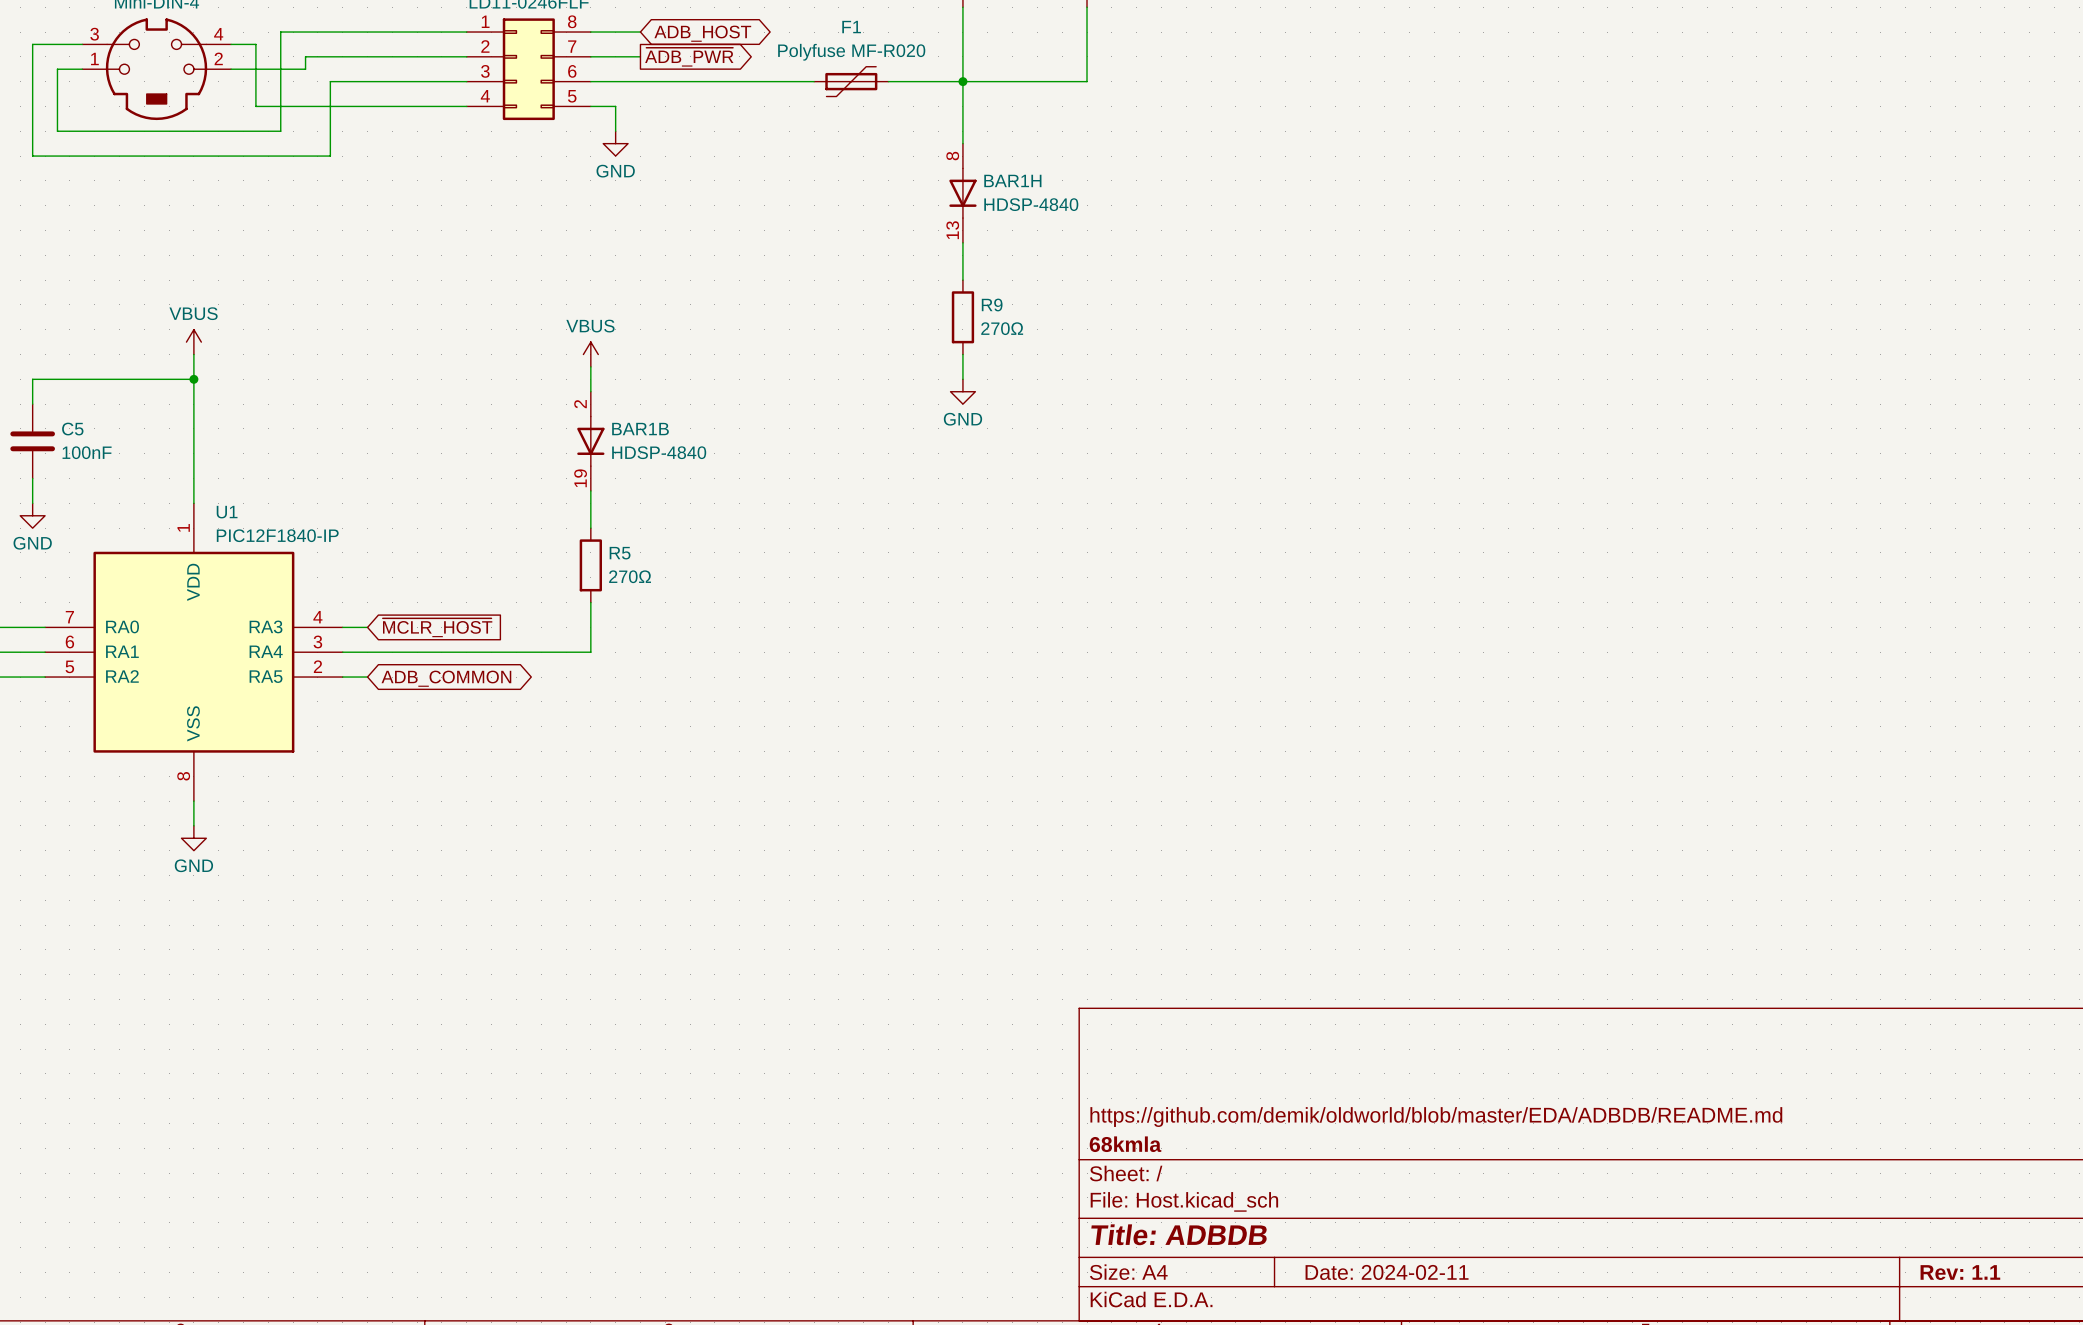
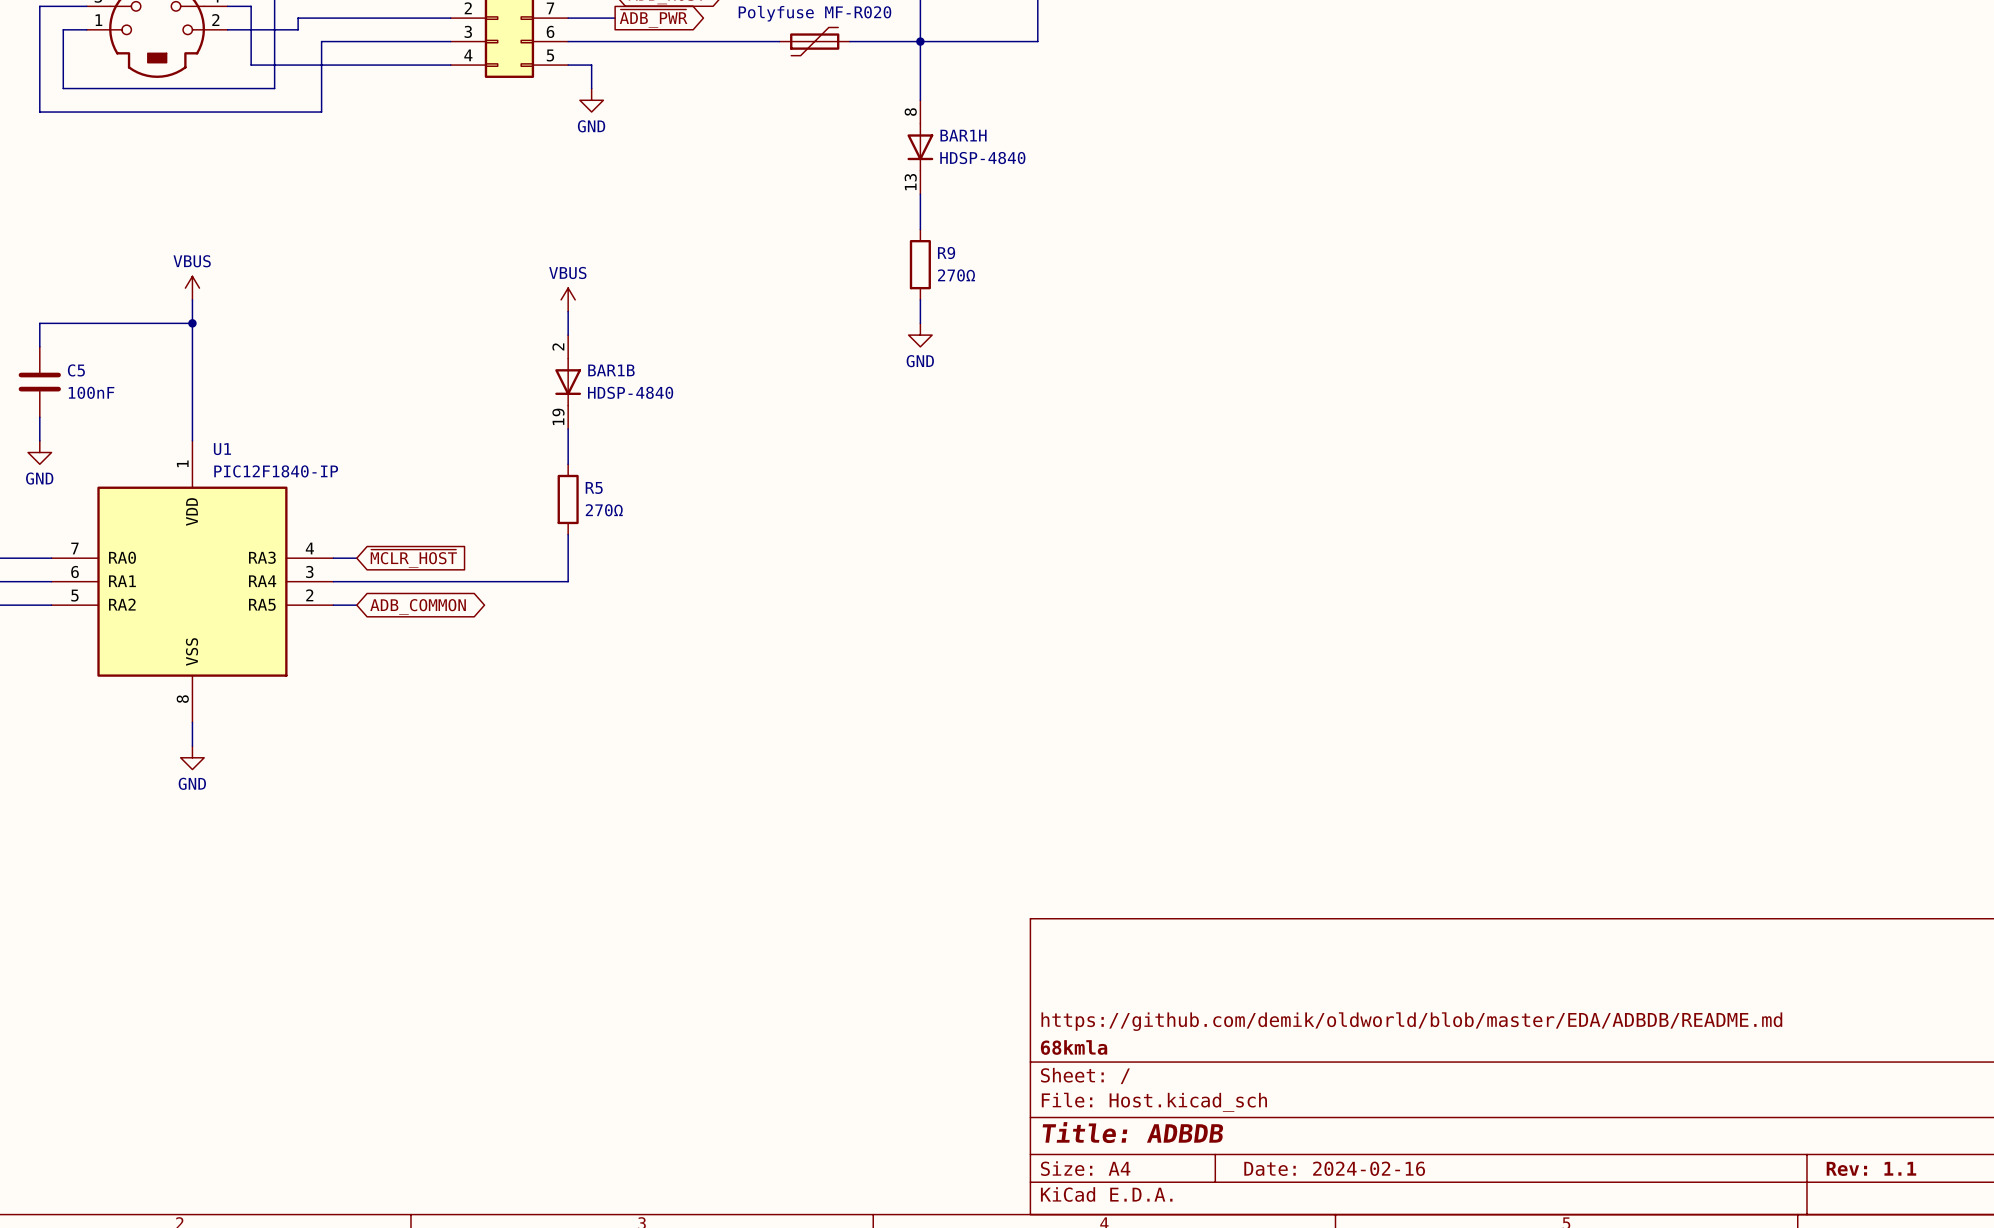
title block: Date: 2024-02-11 (1387, 1272) -> Date: 2024-02-16 (1334, 1168)

